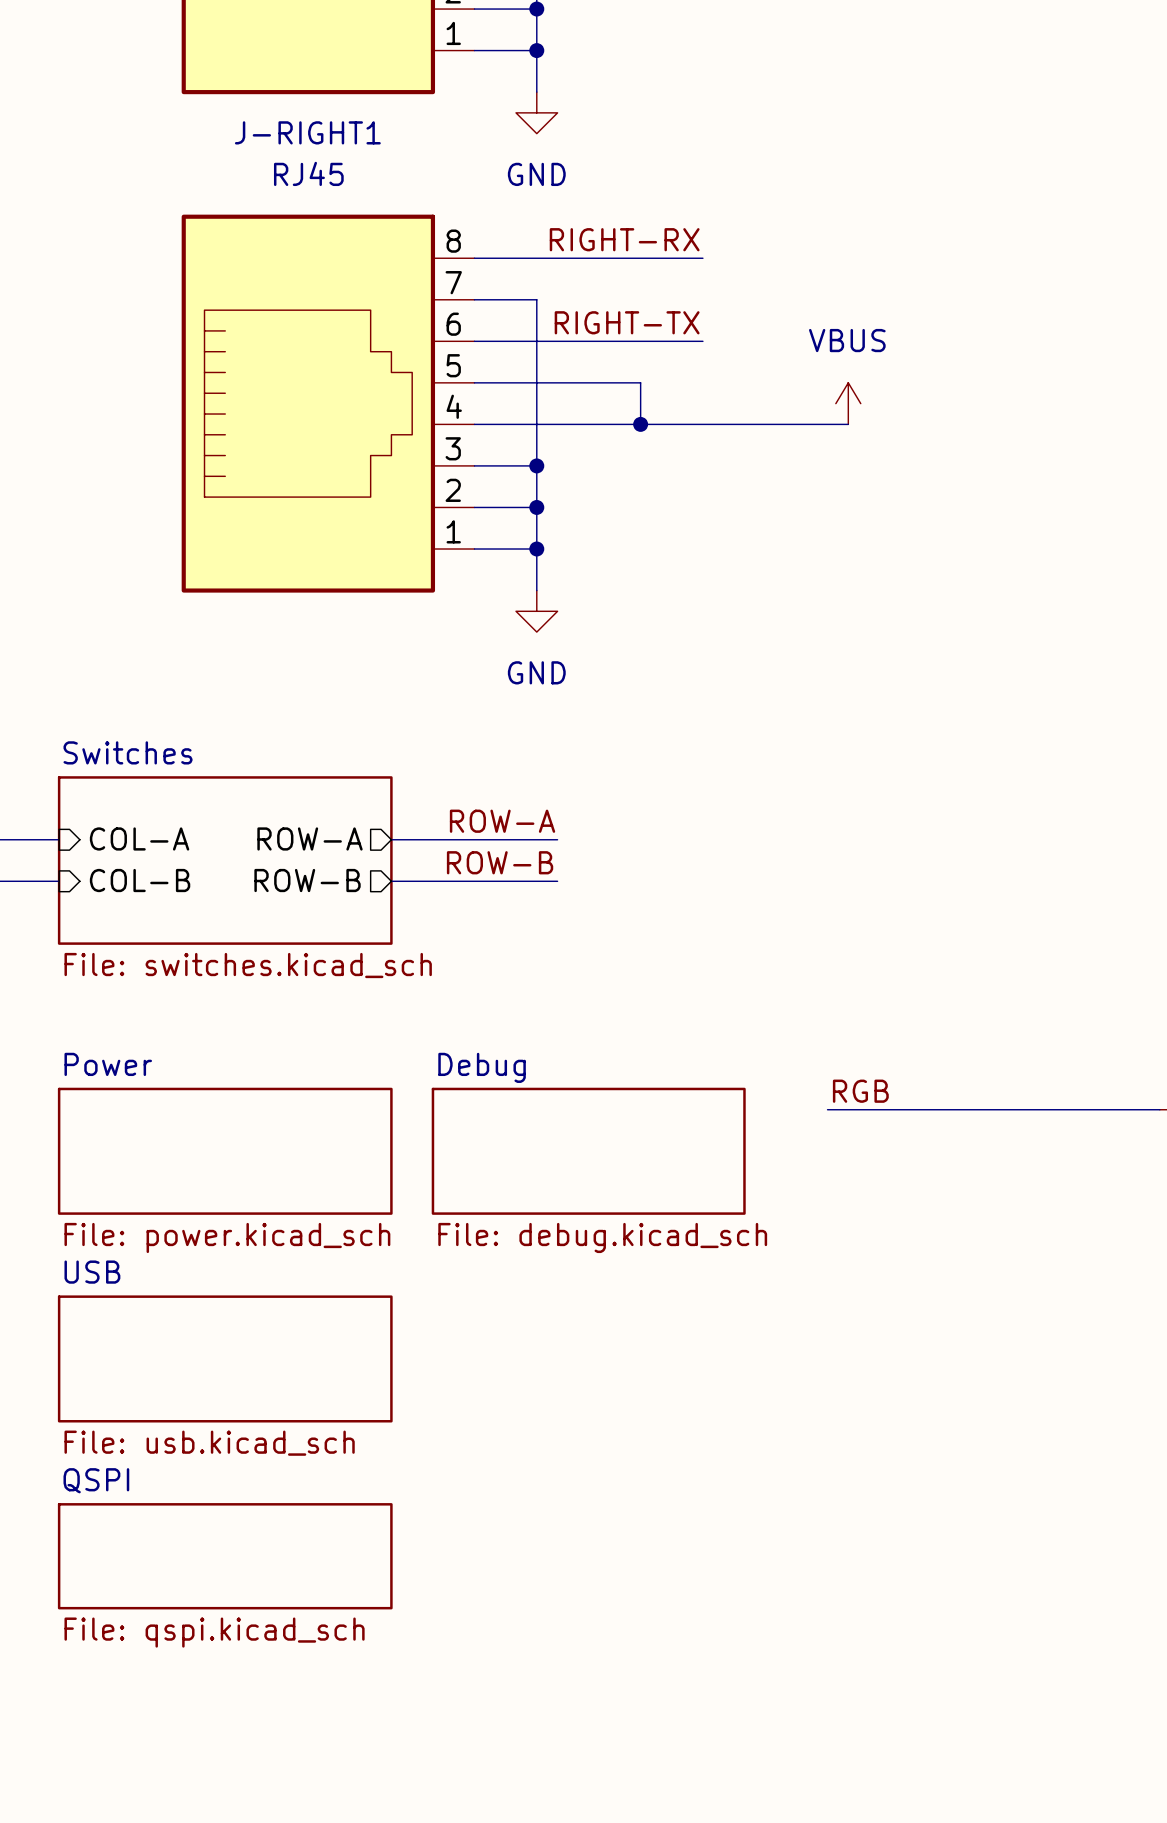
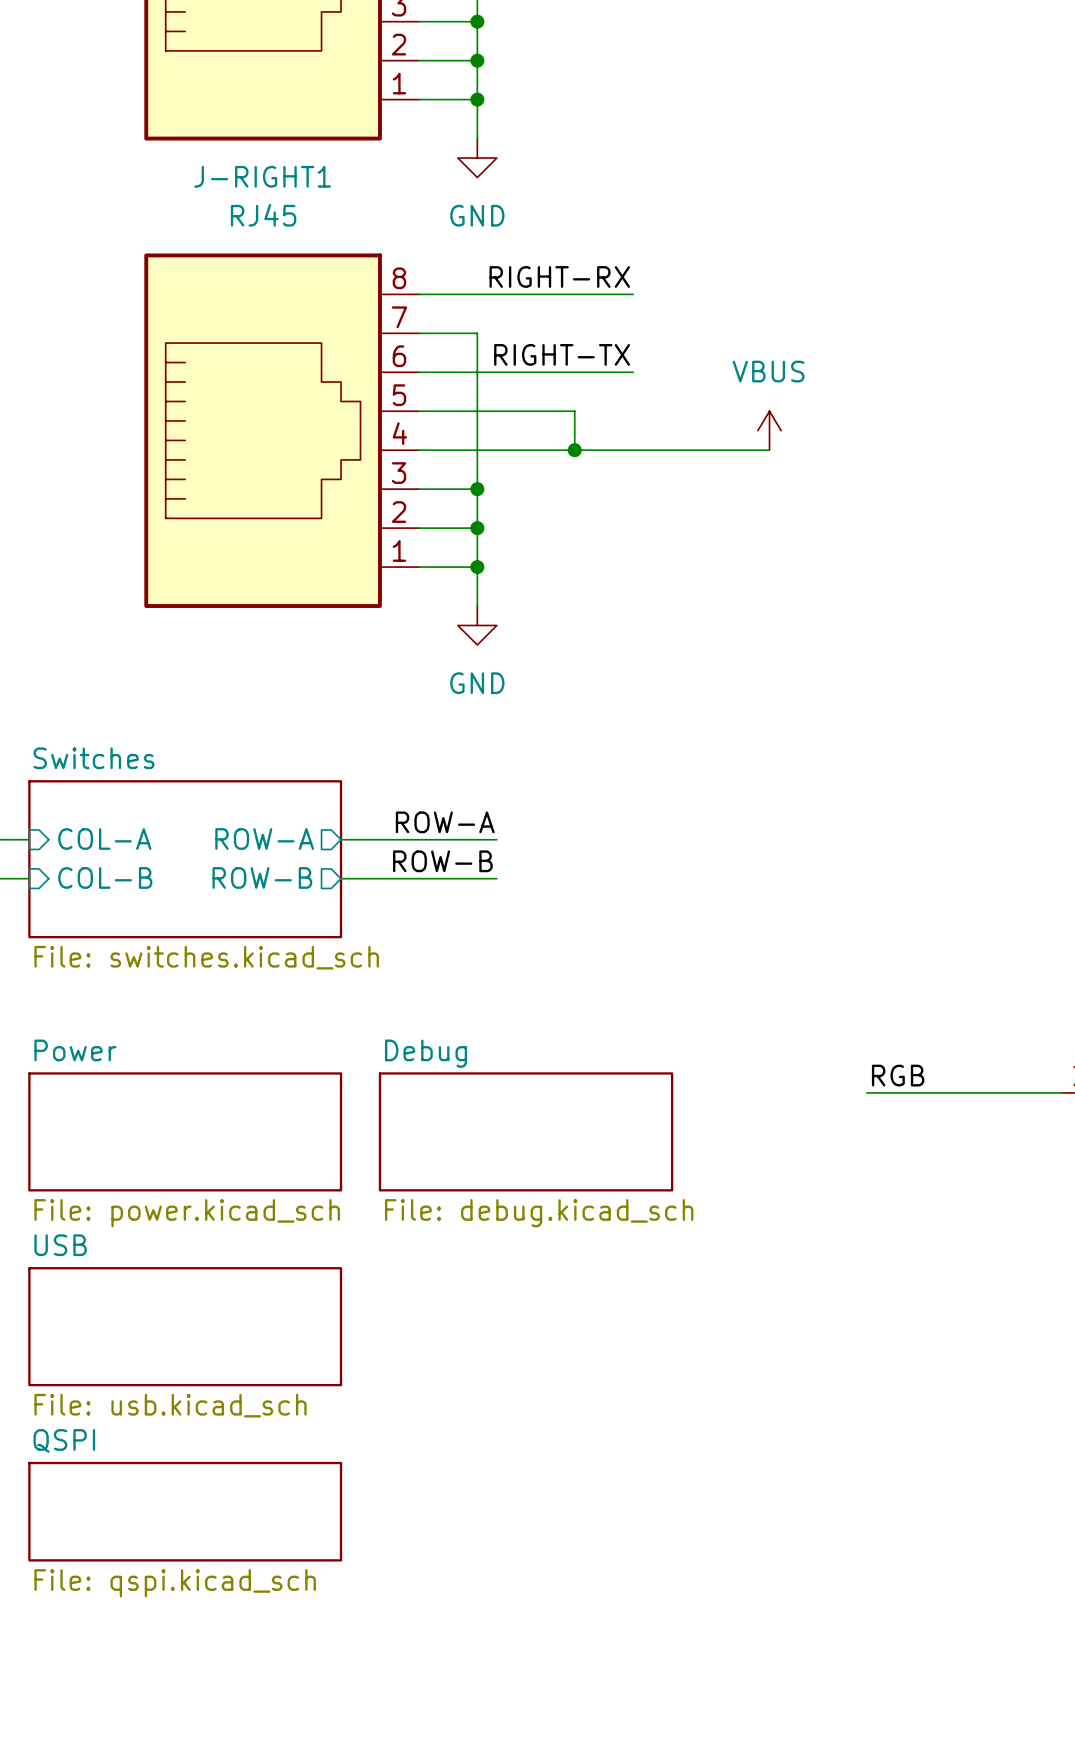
label position: RGB (860, 1091) -> RGB (898, 1075)
wire: (827, 1109) (952, 1109) -> none

